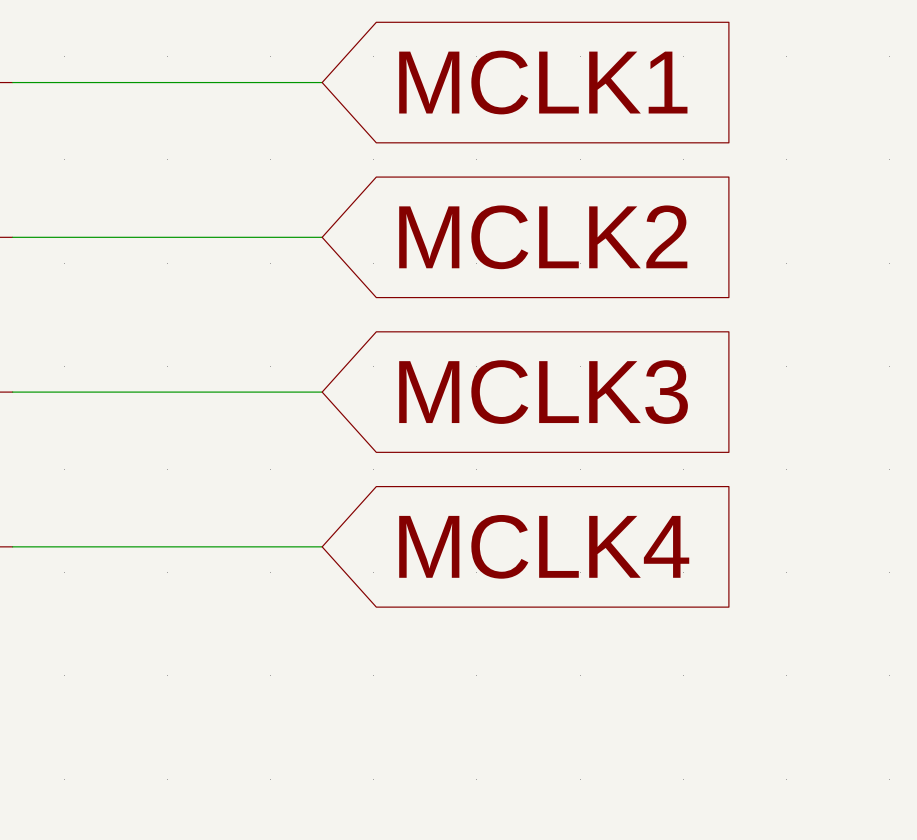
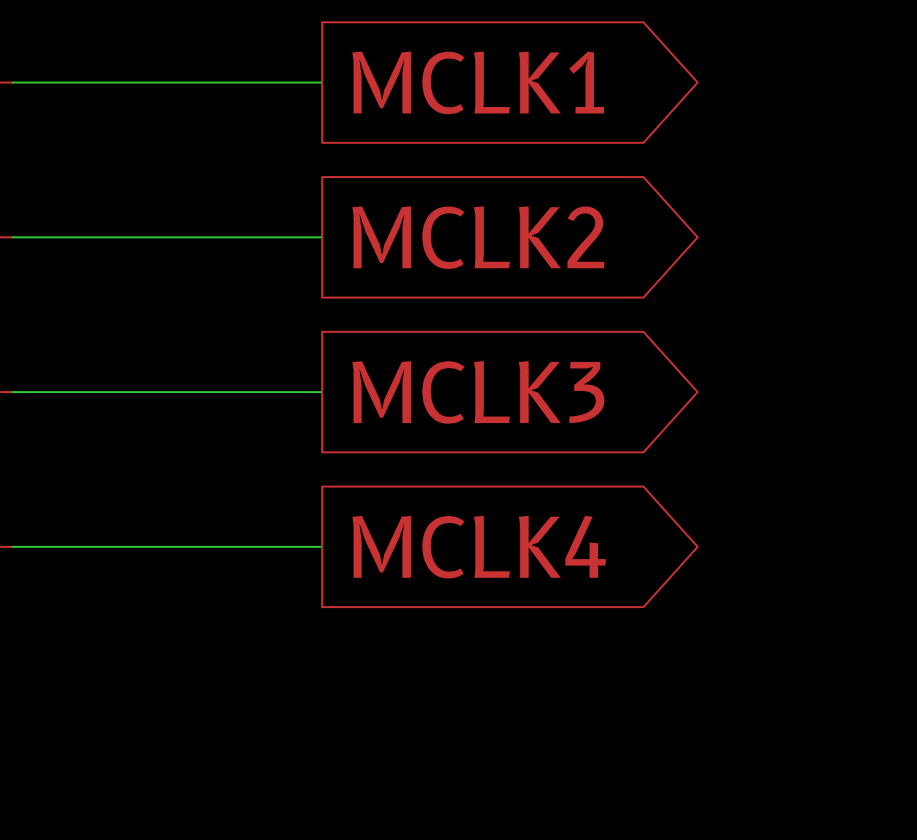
global label shape: input (543, 82) -> output (478, 82)
global label shape: input (543, 237) -> output (478, 237)
global label shape: input (543, 392) -> output (478, 392)
global label shape: input (544, 546) -> output (479, 547)

